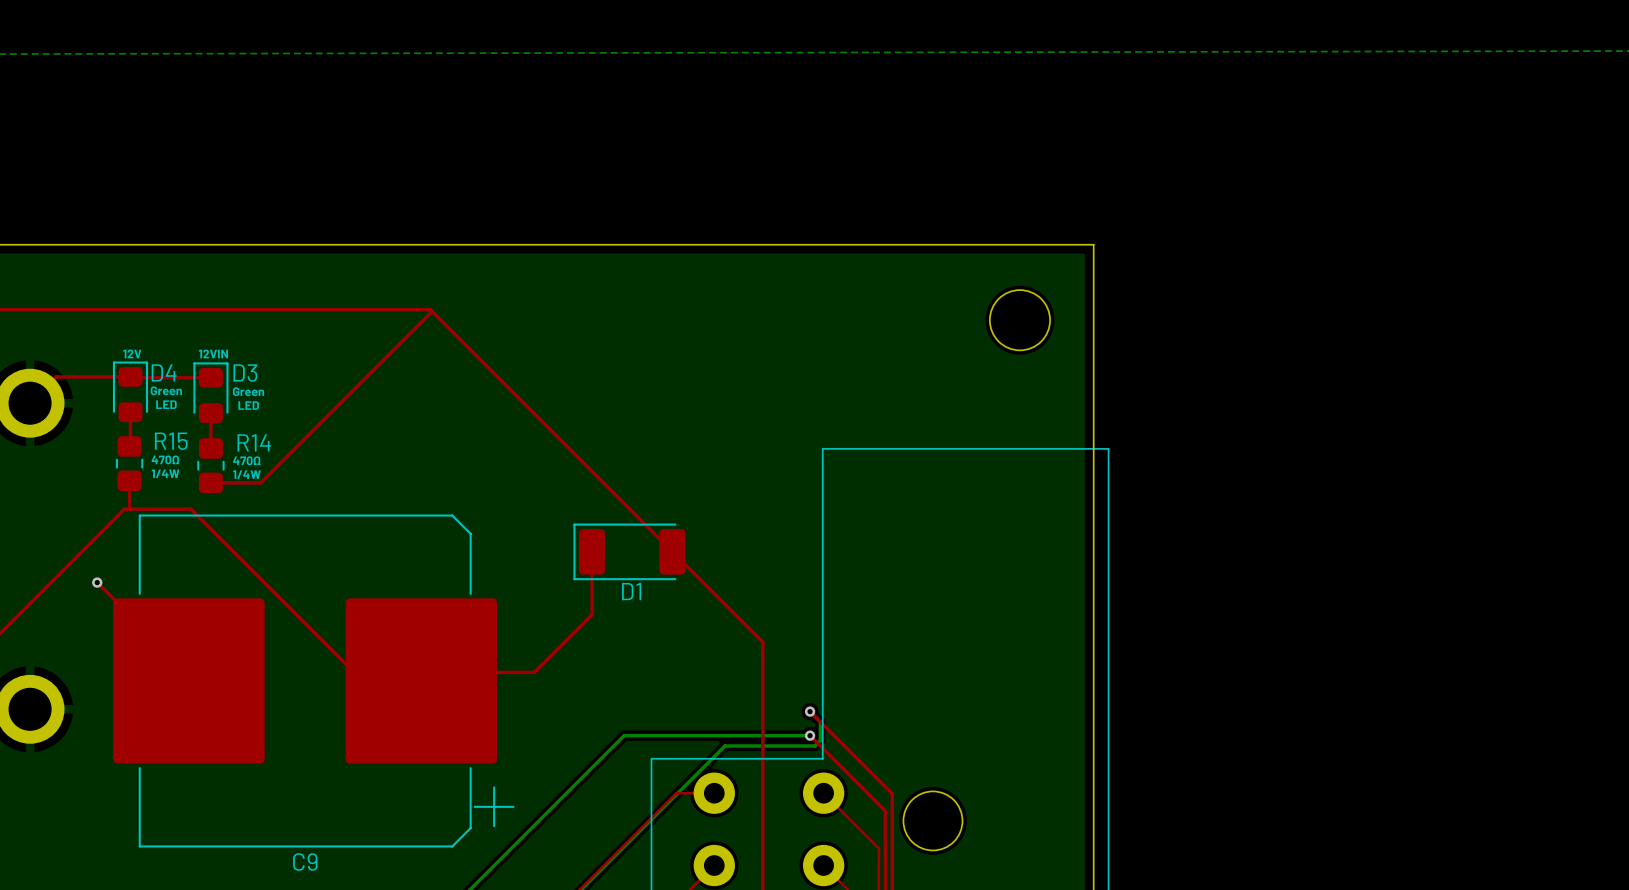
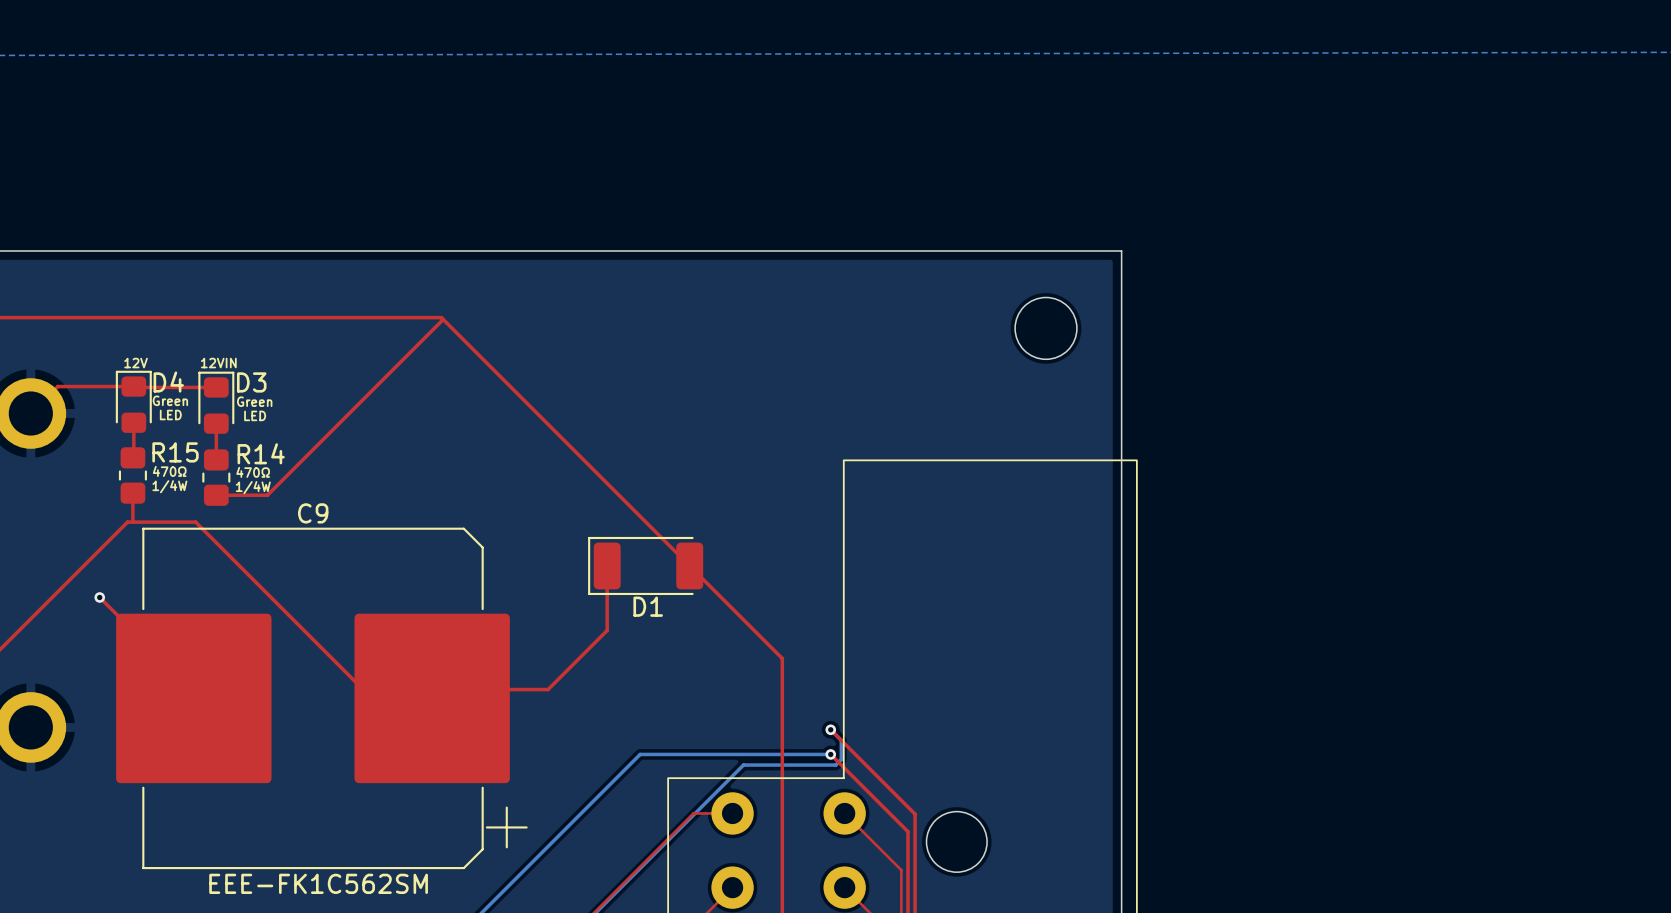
text: none -> EEE-FK1C562SM (318, 883)
C9 name position: C9 (305, 862) -> C9 (313, 513)

